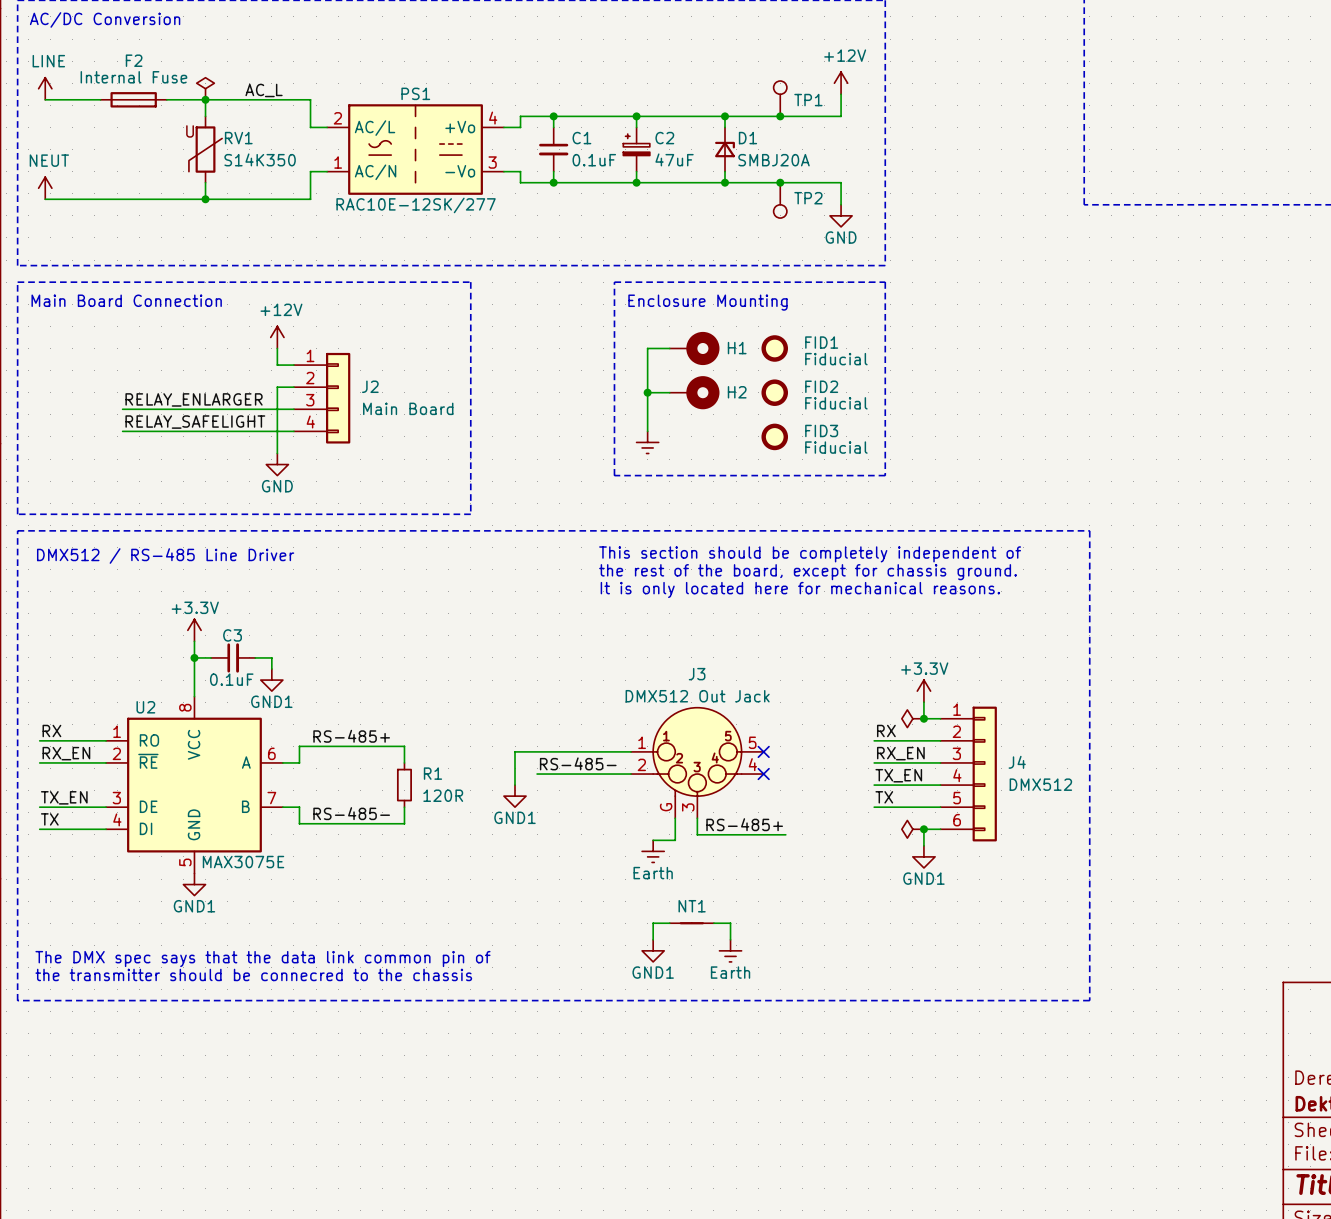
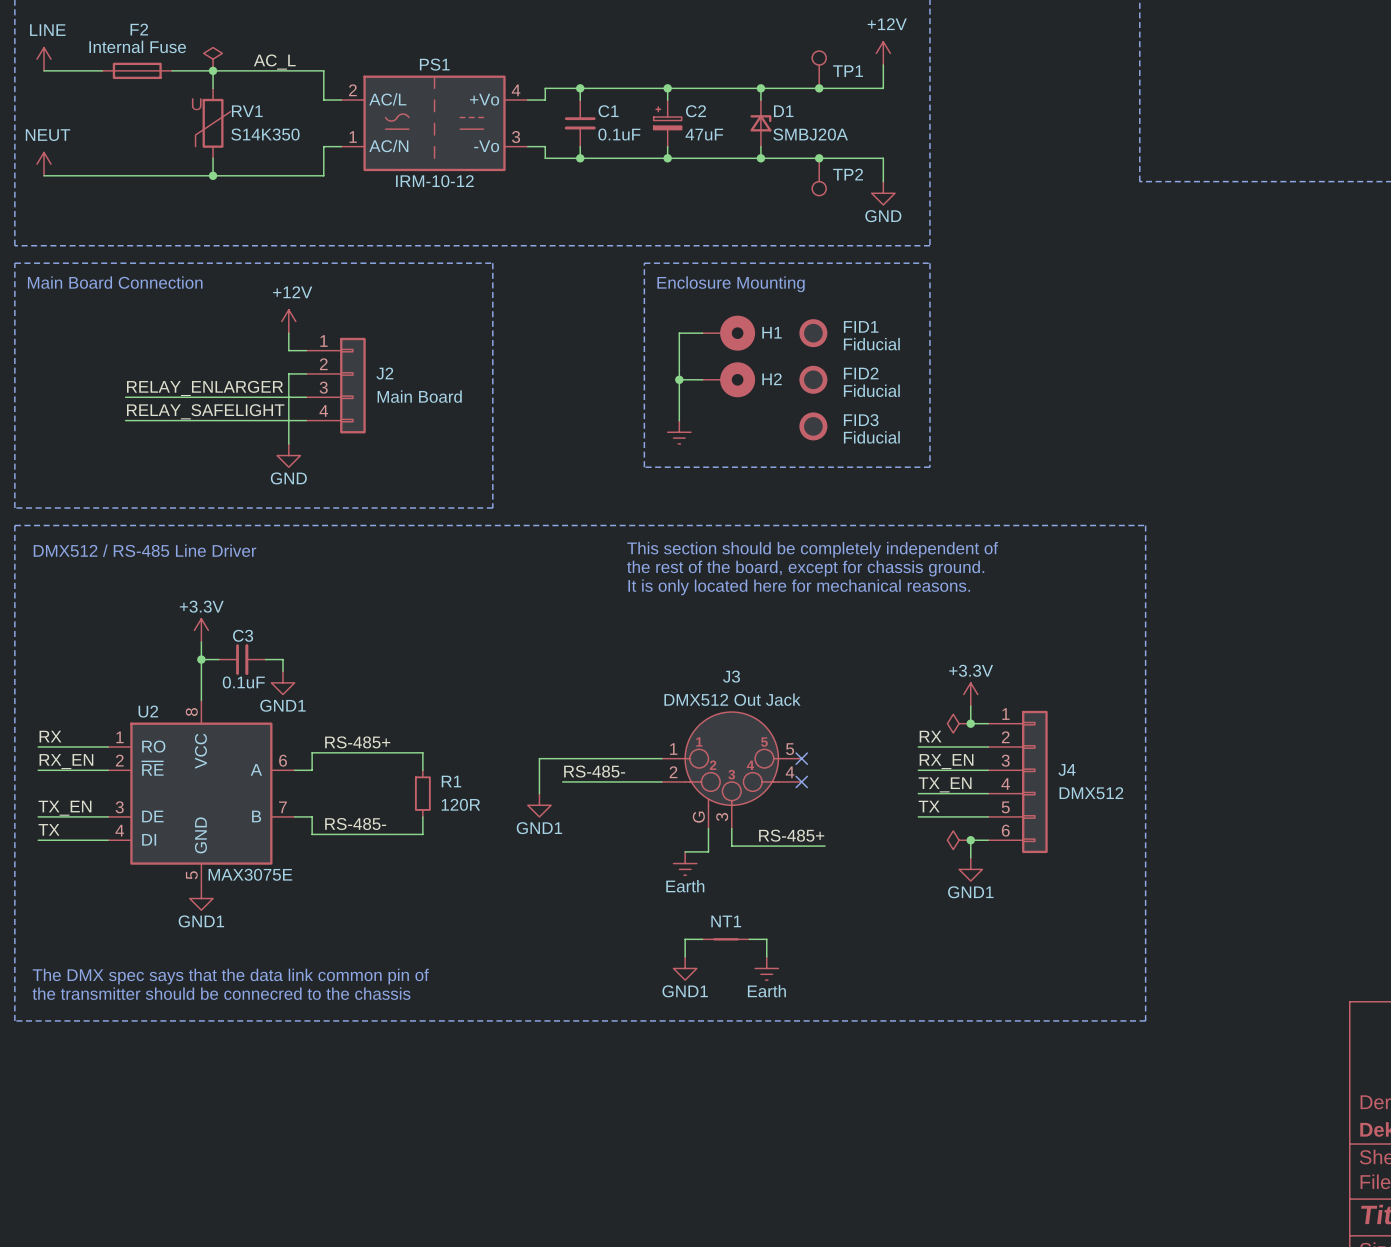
PS1 value: RAC10E-12SK/277 (416, 205) -> IRM-10-12 (434, 181)

